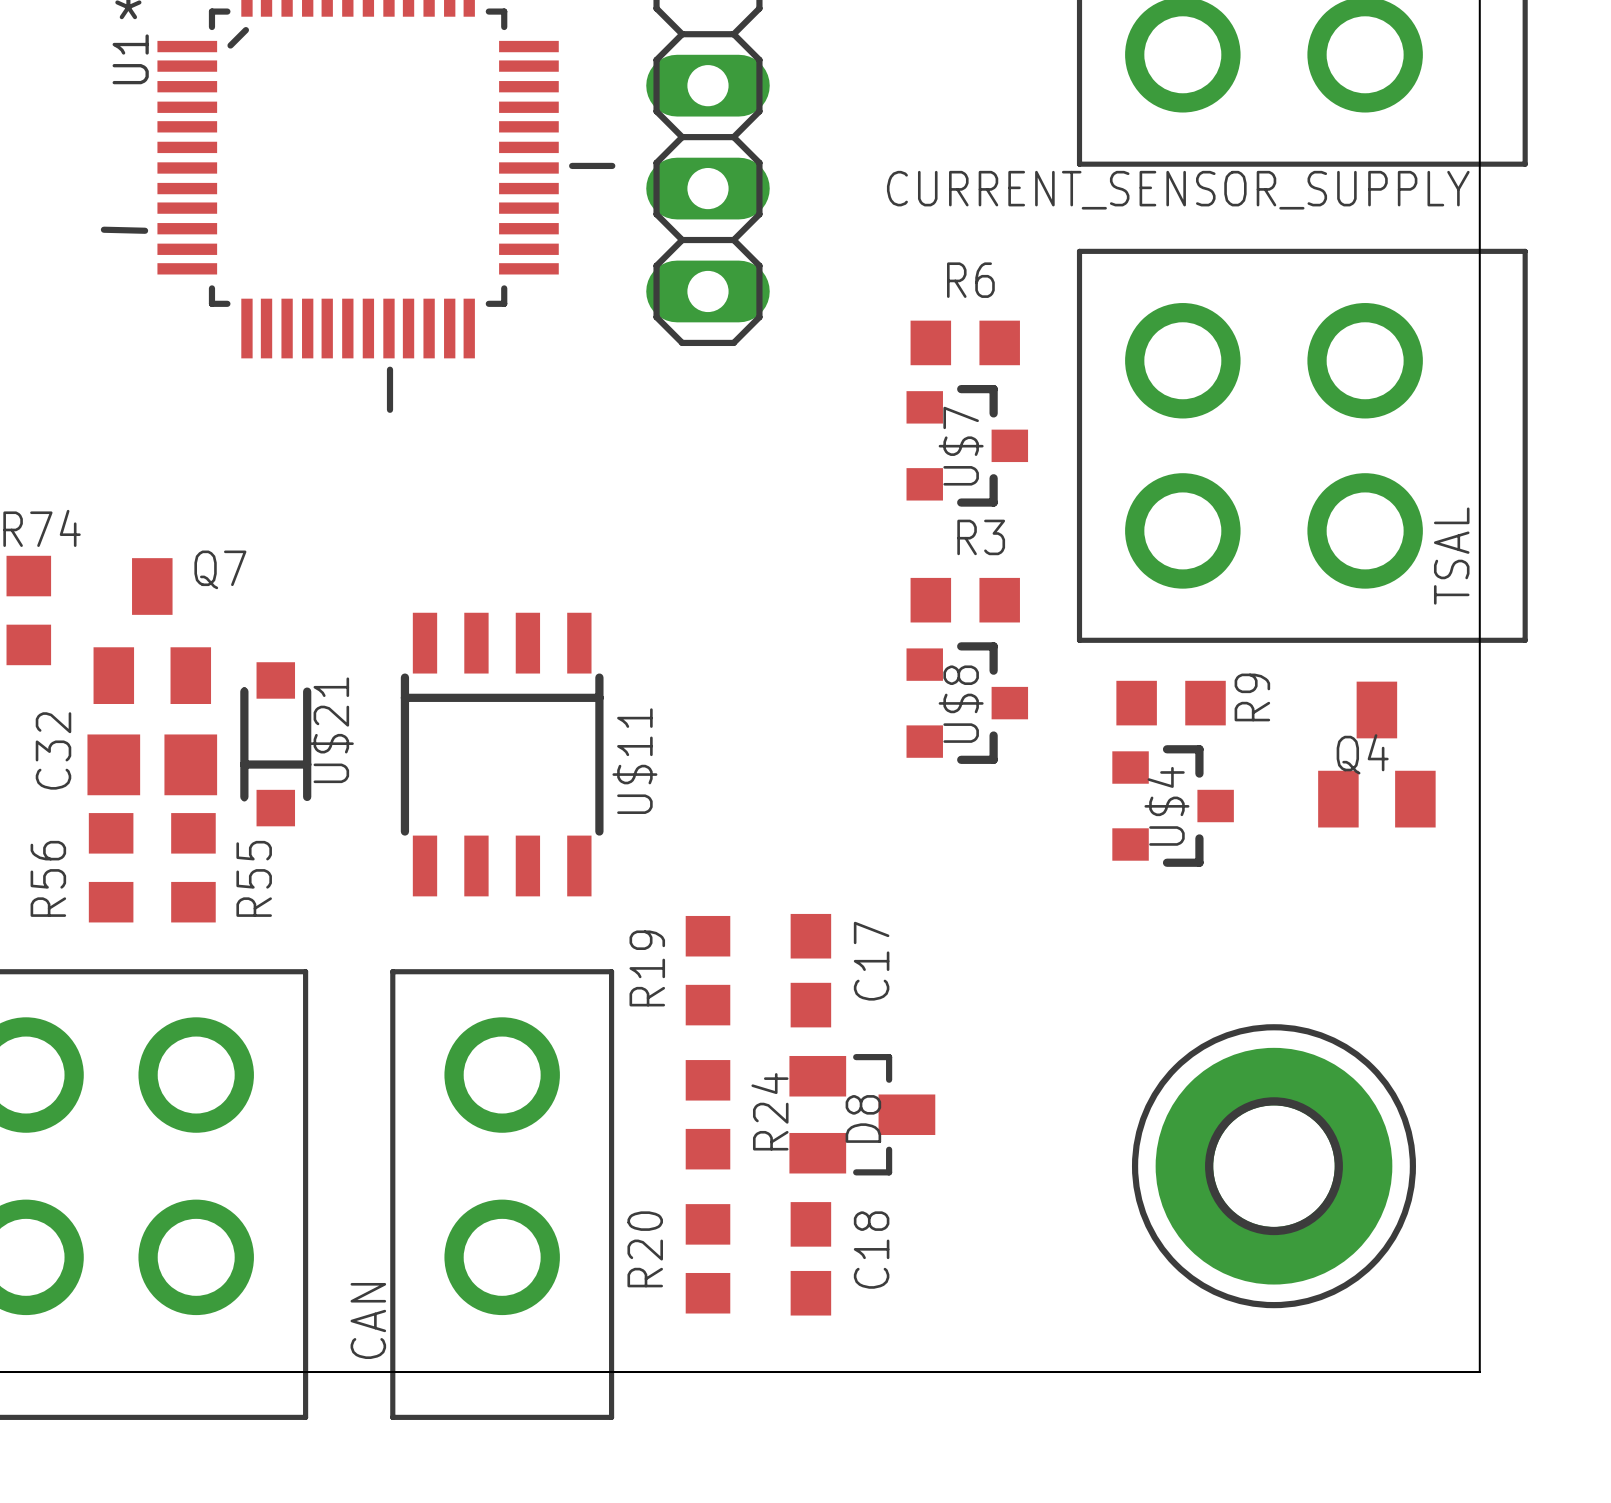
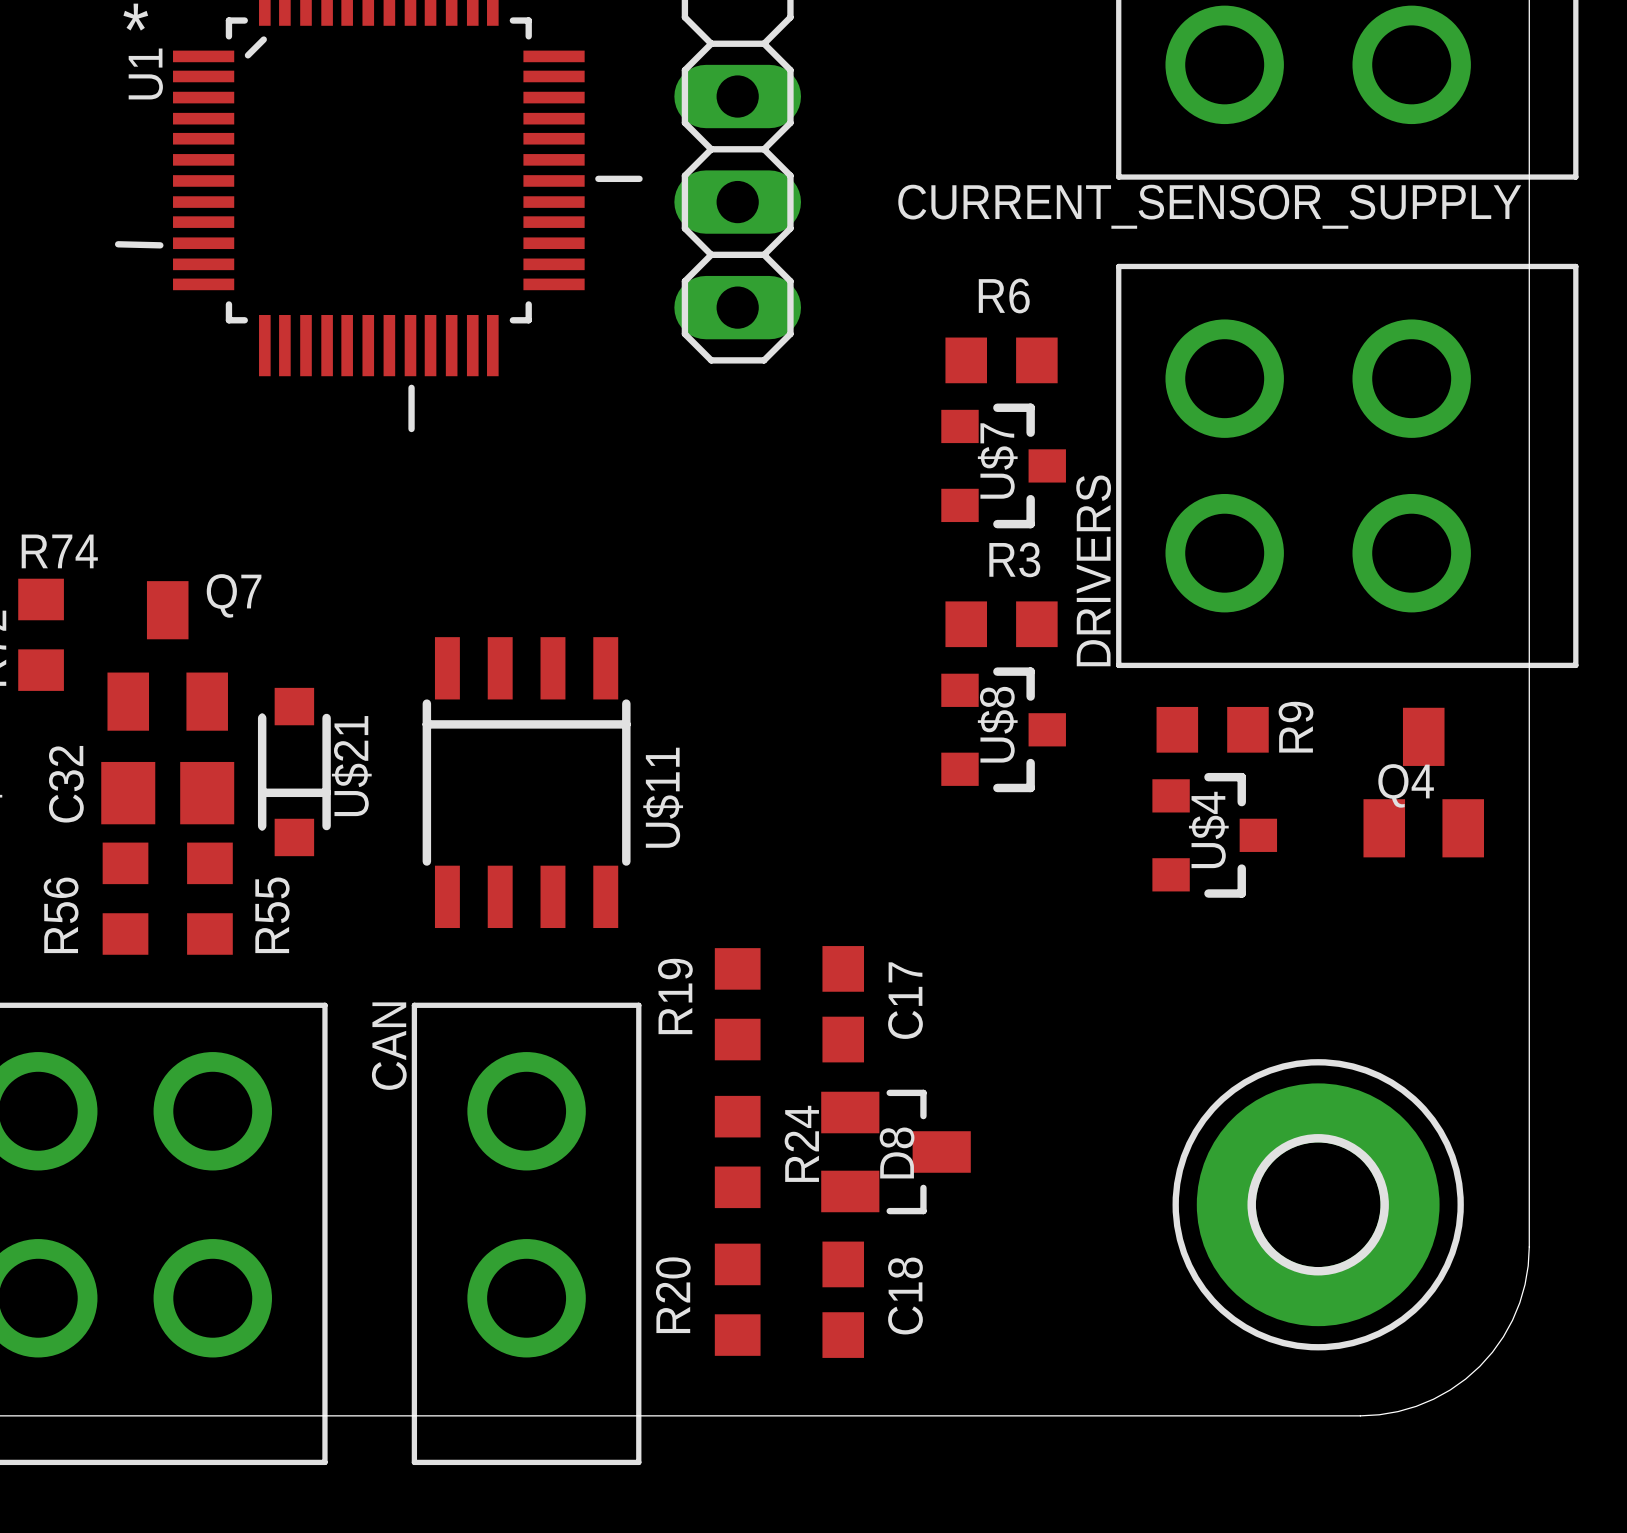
TSAL name: TSAL (1451, 556) -> DRIVERS (1093, 570)
board edge: (1479, 1207) (1479, 1372) (1315, 1372) -> (1529, 1246) (1525, 1284) (1519, 1302) (1503, 1336) (1479, 1366) (1450, 1389) (1416, 1406) (1397, 1411) (1360, 1415)
CAN name position: CAN (368, 1320) -> CAN (389, 1046)

